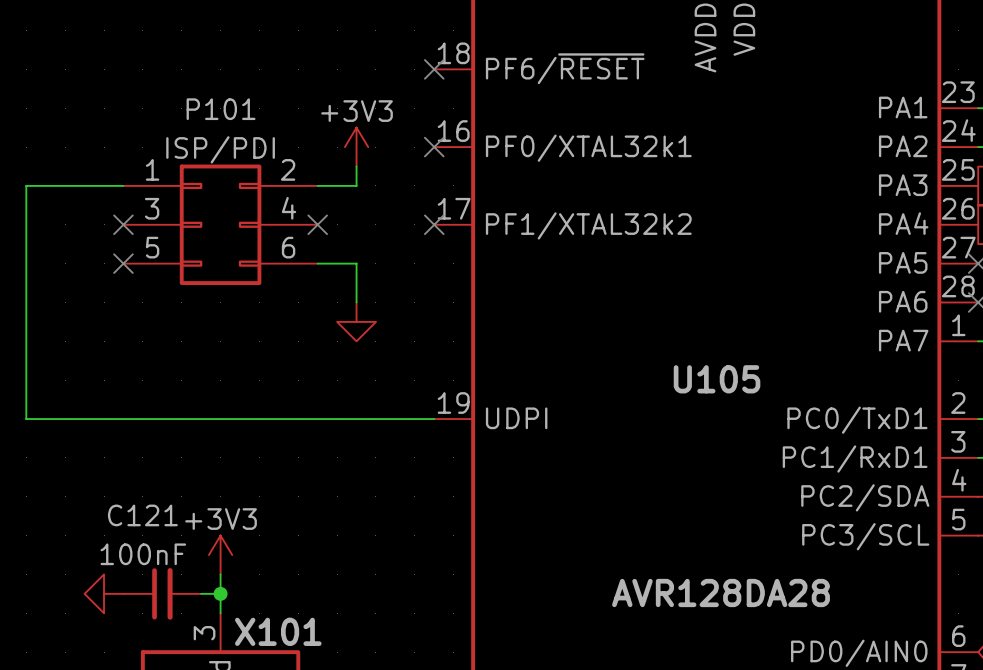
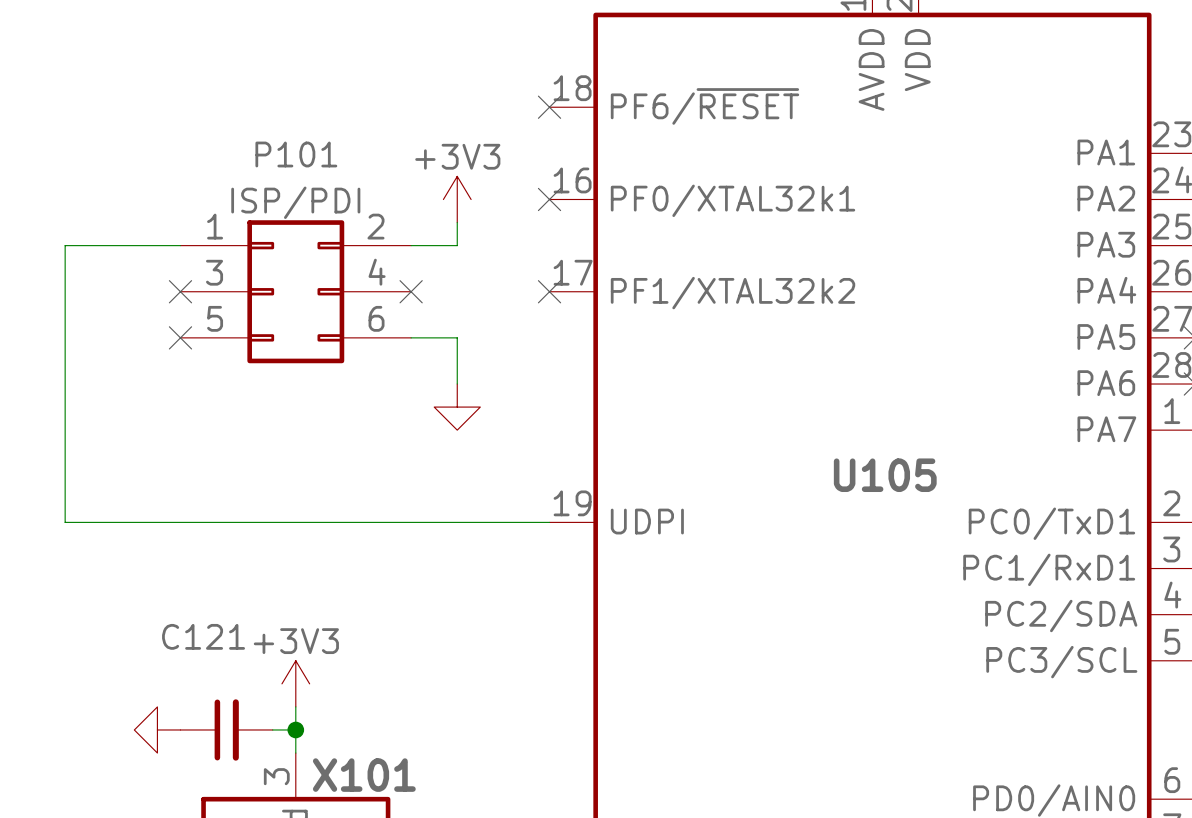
C121 value: 100nF (143, 554) -> none
U105 value: AVR128DA28 (721, 592) -> none

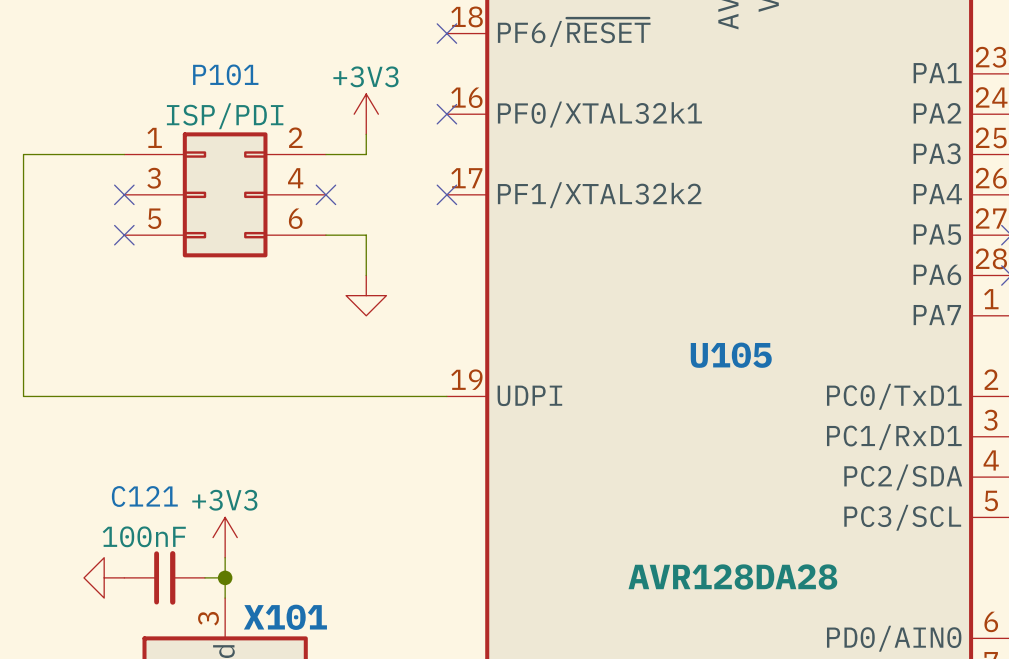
C121 value: none -> 100nF (144, 536)
U105 value: none -> AVR128DA28 (732, 576)

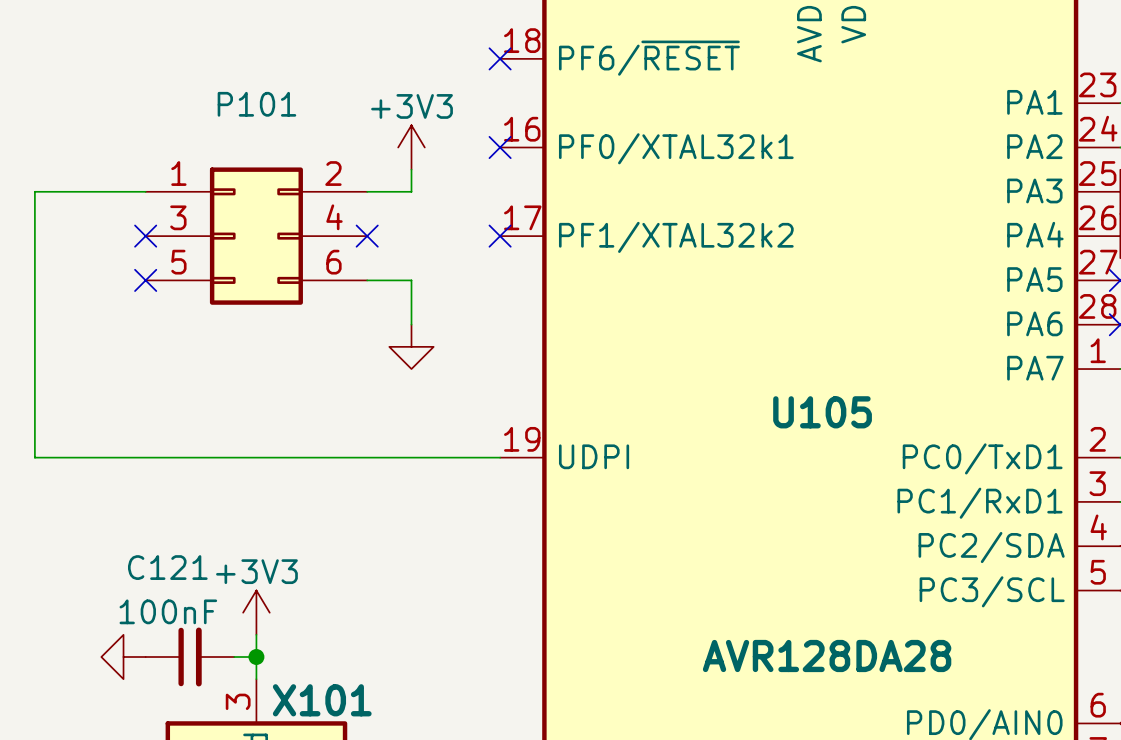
P101 value: ISP/PDI (225, 116) -> none

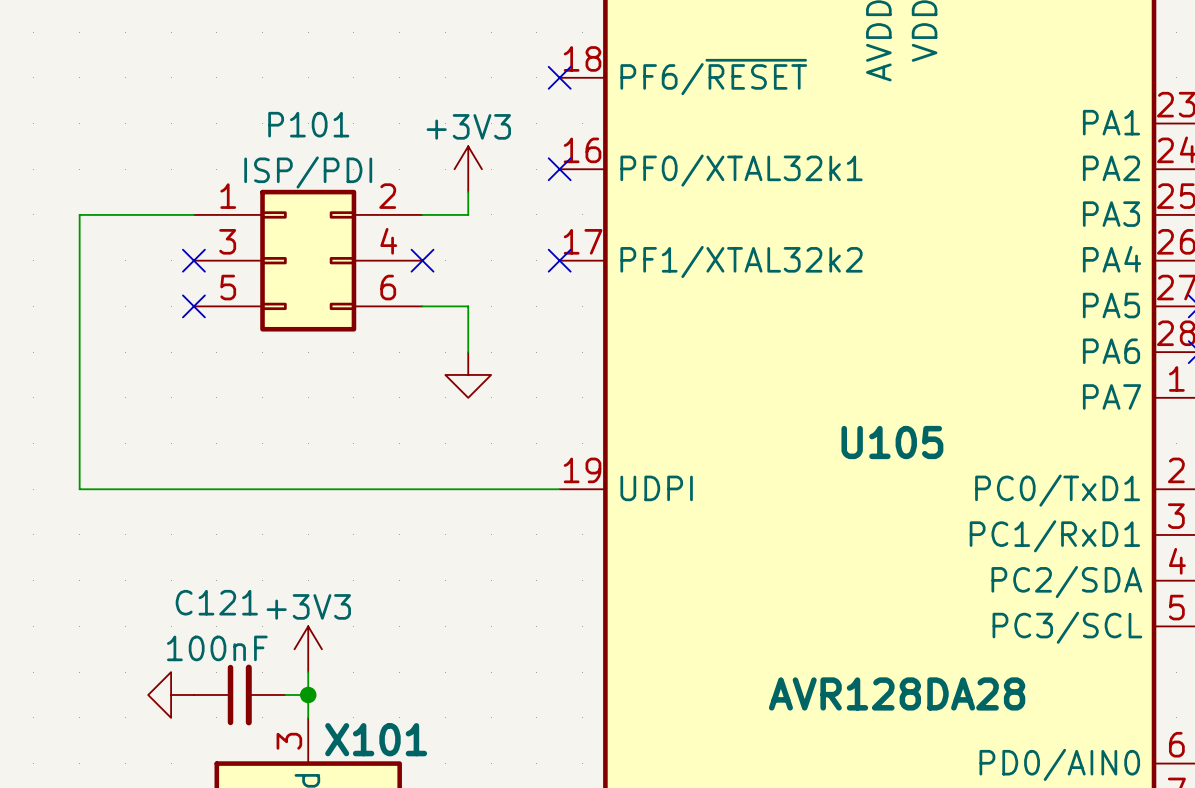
P101 value: none -> ISP/PDI (308, 172)

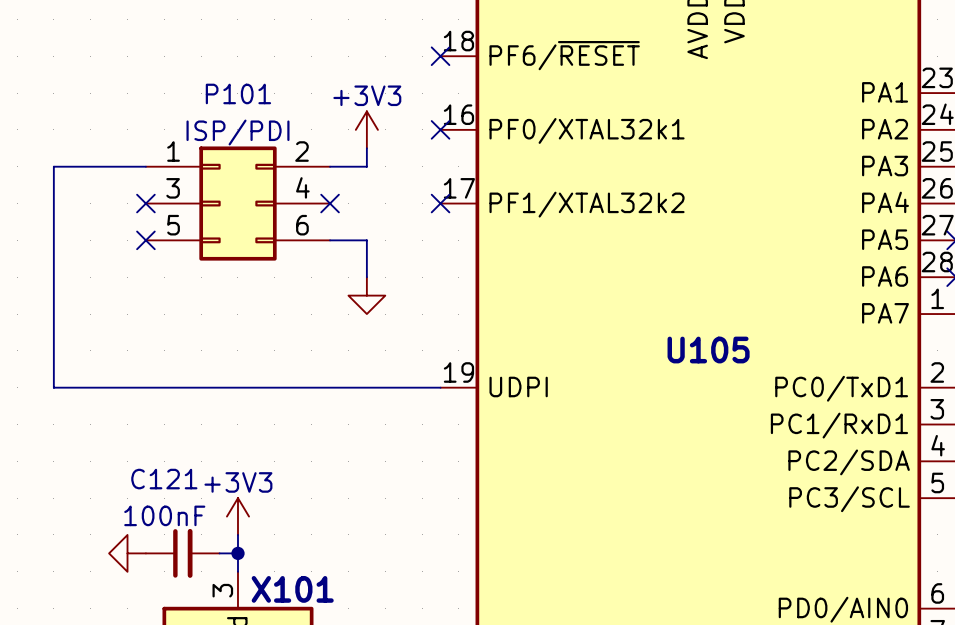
U105 value: AVR128DA28 (897, 693) -> none

